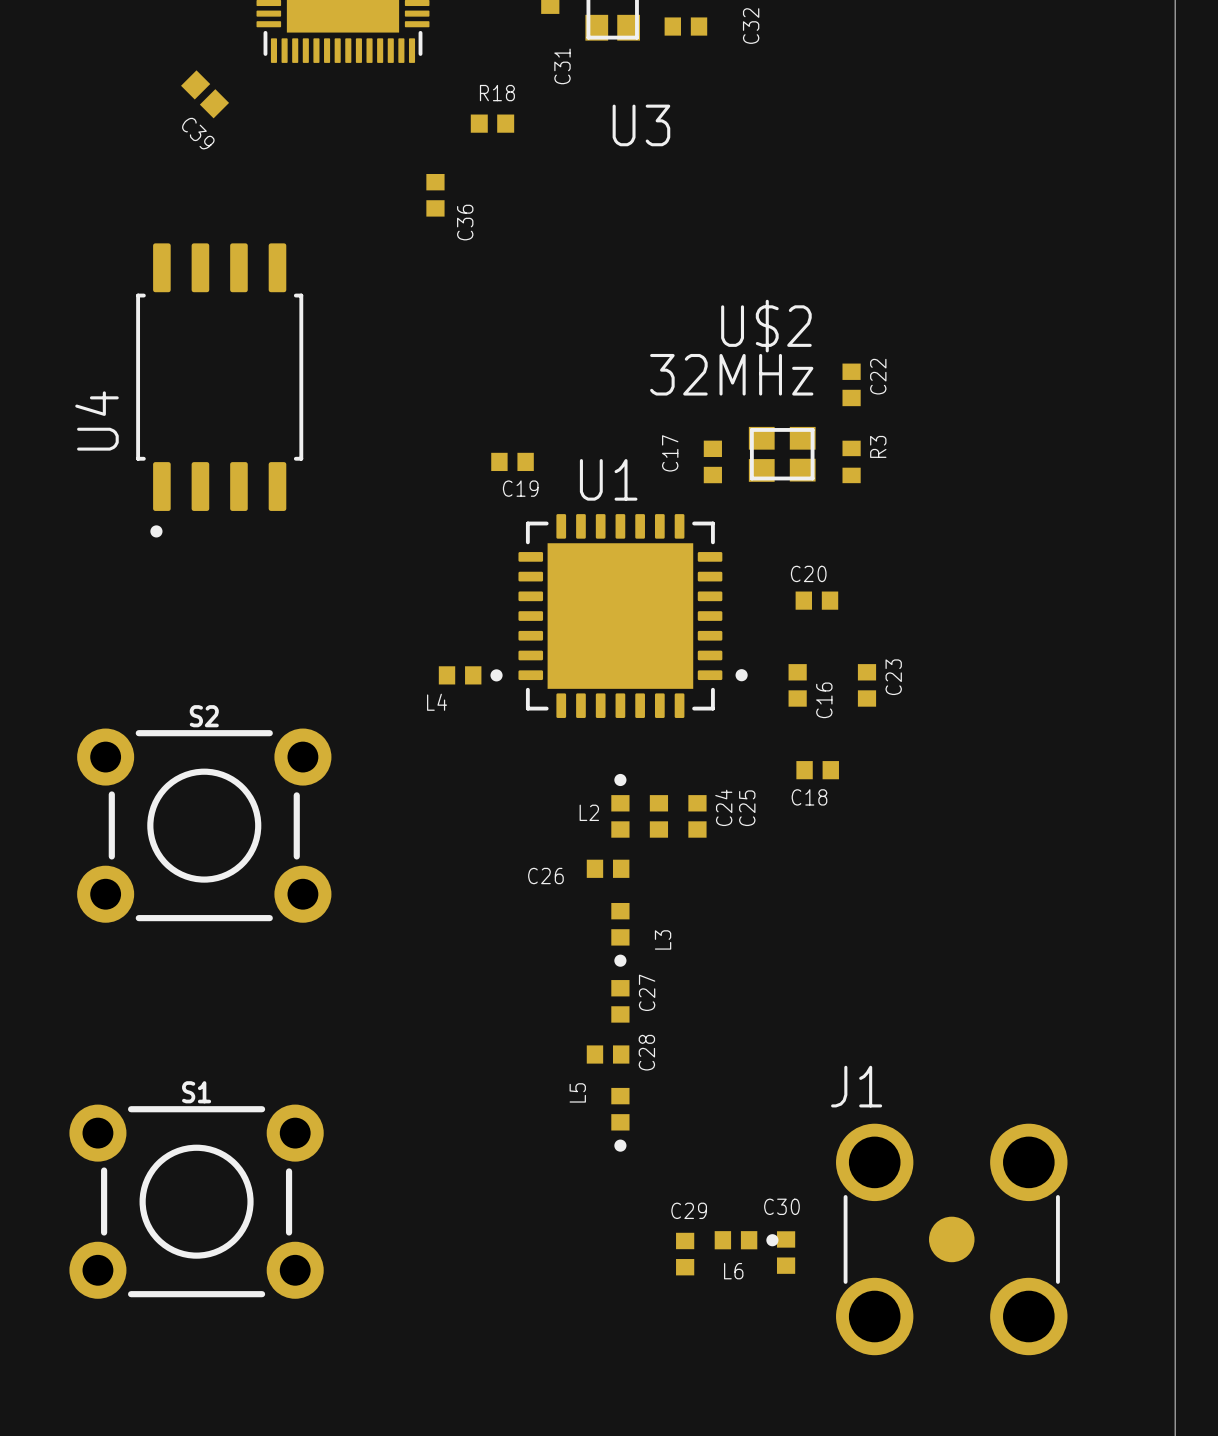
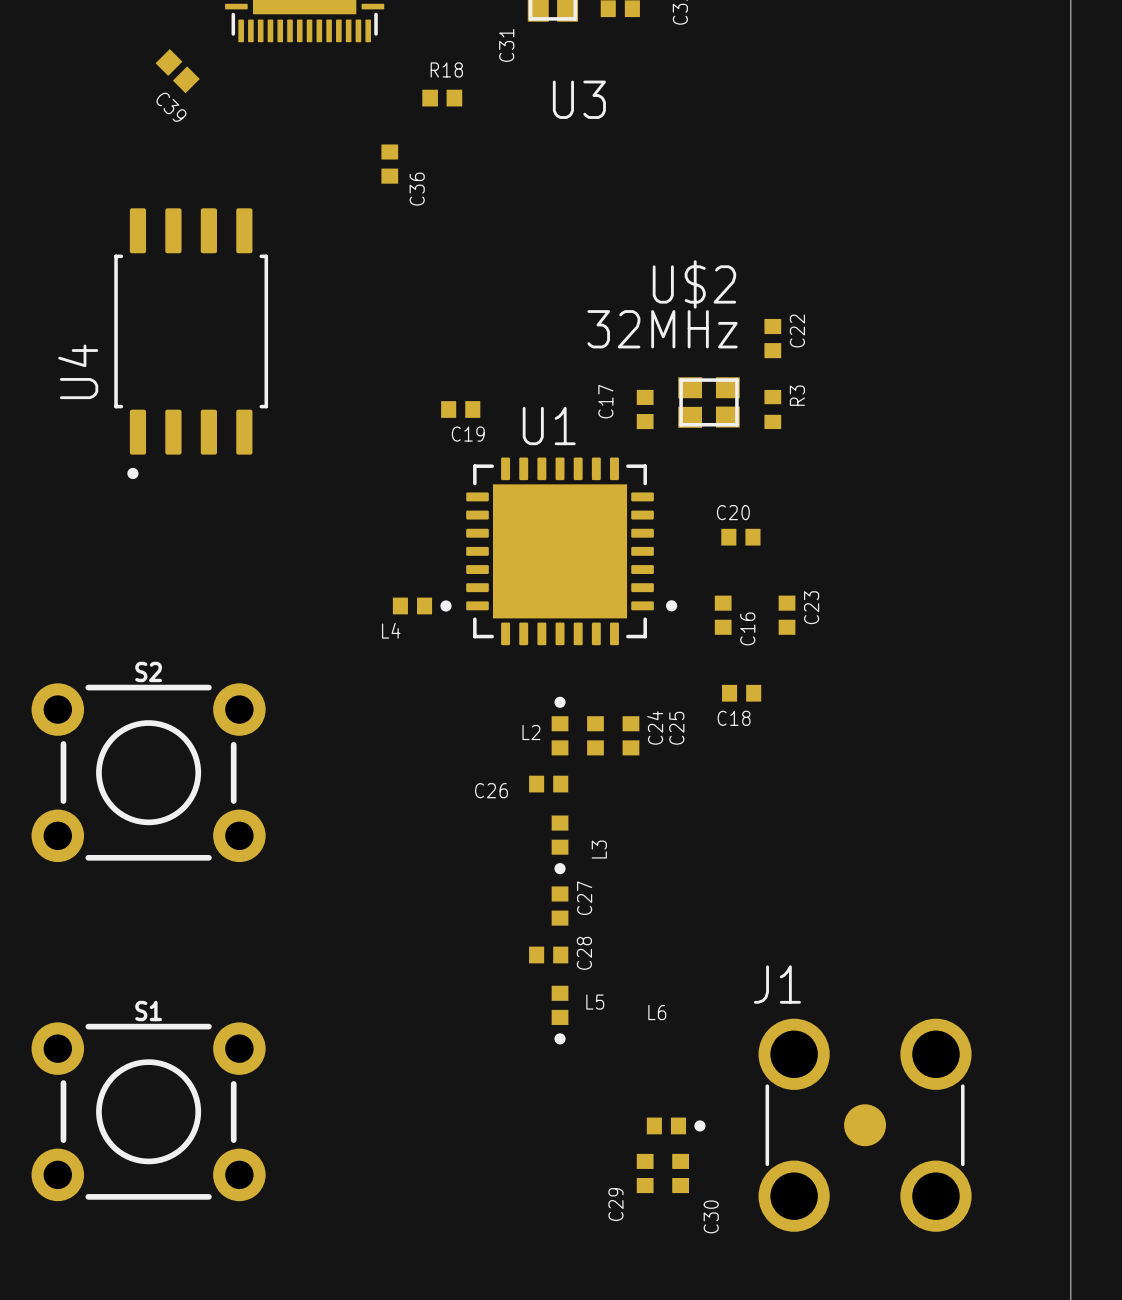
S2 position: (204, 825) -> (148, 772)
L5 name rotation: 0° (577, 1092) -> 90° clockwise (595, 1002)
L5 name position: L5 (577, 1092) -> L5 (595, 1002)
S1 position: (196, 1201) -> (148, 1111)
C30 name rotation: 0° (781, 1206) -> 90° counterclockwise (711, 1216)
C30 name position: C30 (781, 1206) -> C30 (711, 1216)
C29 name rotation: 0° (689, 1210) -> 90° counterclockwise (615, 1204)
C29 name position: C29 (689, 1210) -> C29 (615, 1204)
C30 position: (786, 1252) -> (680, 1173)
C29 position: (685, 1254) -> (645, 1173)
L6 name position: L6 (733, 1271) -> L6 (657, 1012)

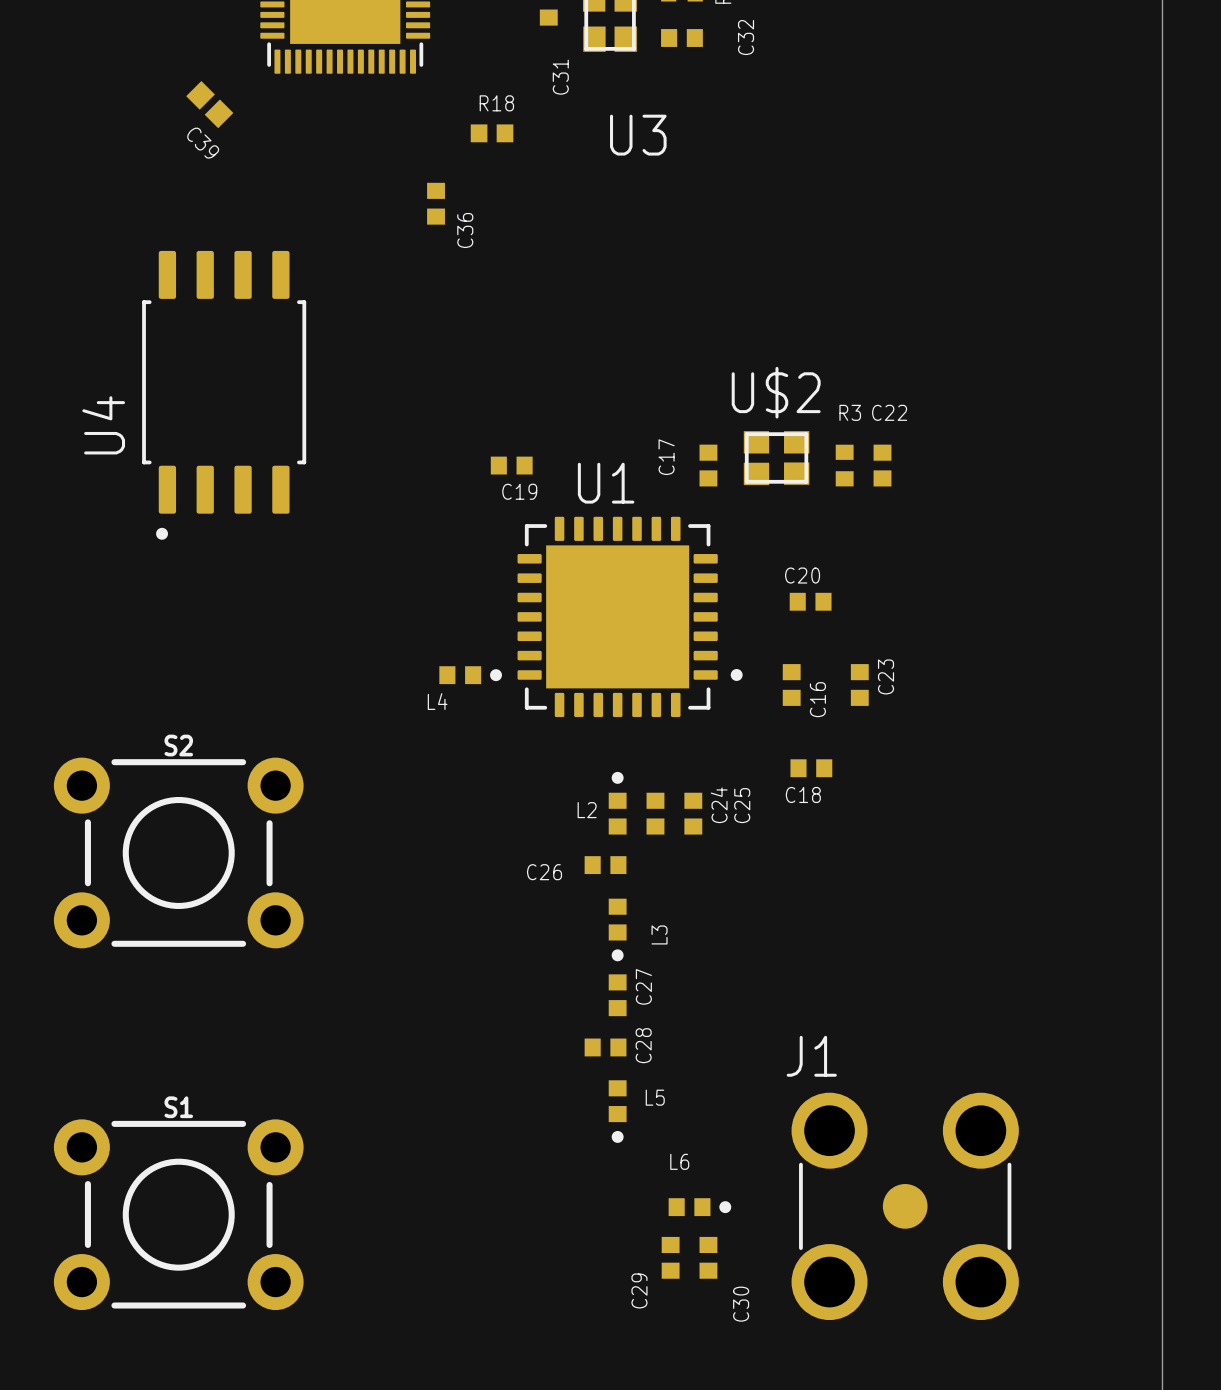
U$2 name position: U$2 (694, 284) -> U$2 (776, 392)
U$2 value: 32MHz (662, 329) -> none
C22 name rotation: 0° (797, 331) -> 90° clockwise (889, 412)
C22 position: (772, 338) -> (882, 465)
R3 name rotation: 0° (797, 395) -> 90° clockwise (850, 412)
R3 name position: R3 (797, 395) -> R3 (850, 412)
L6 name position: L6 (657, 1012) -> L6 (679, 1161)
L6 position: (676, 1125) -> (699, 1207)
J1 position: (865, 1125) -> (905, 1206)
C29 position: (645, 1173) -> (670, 1257)
C30 position: (680, 1173) -> (708, 1257)

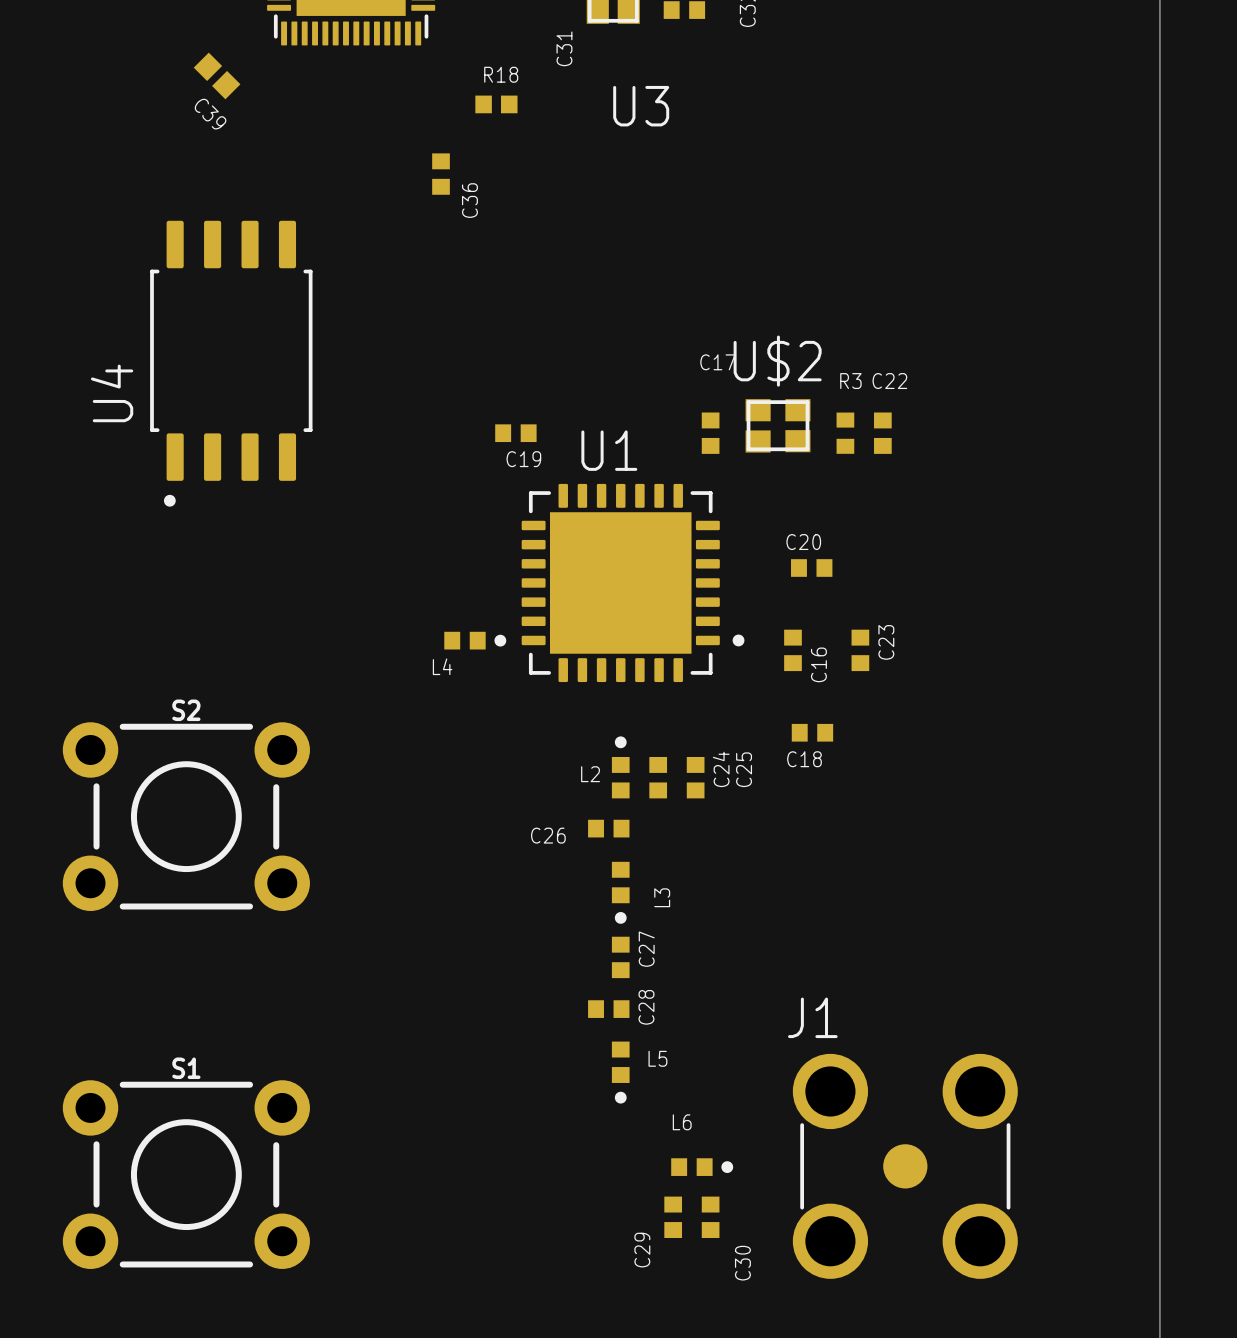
C17 name rotation: 0° (666, 457) -> 90° clockwise (717, 362)
C17 name position: C17 (666, 457) -> C17 (717, 362)

